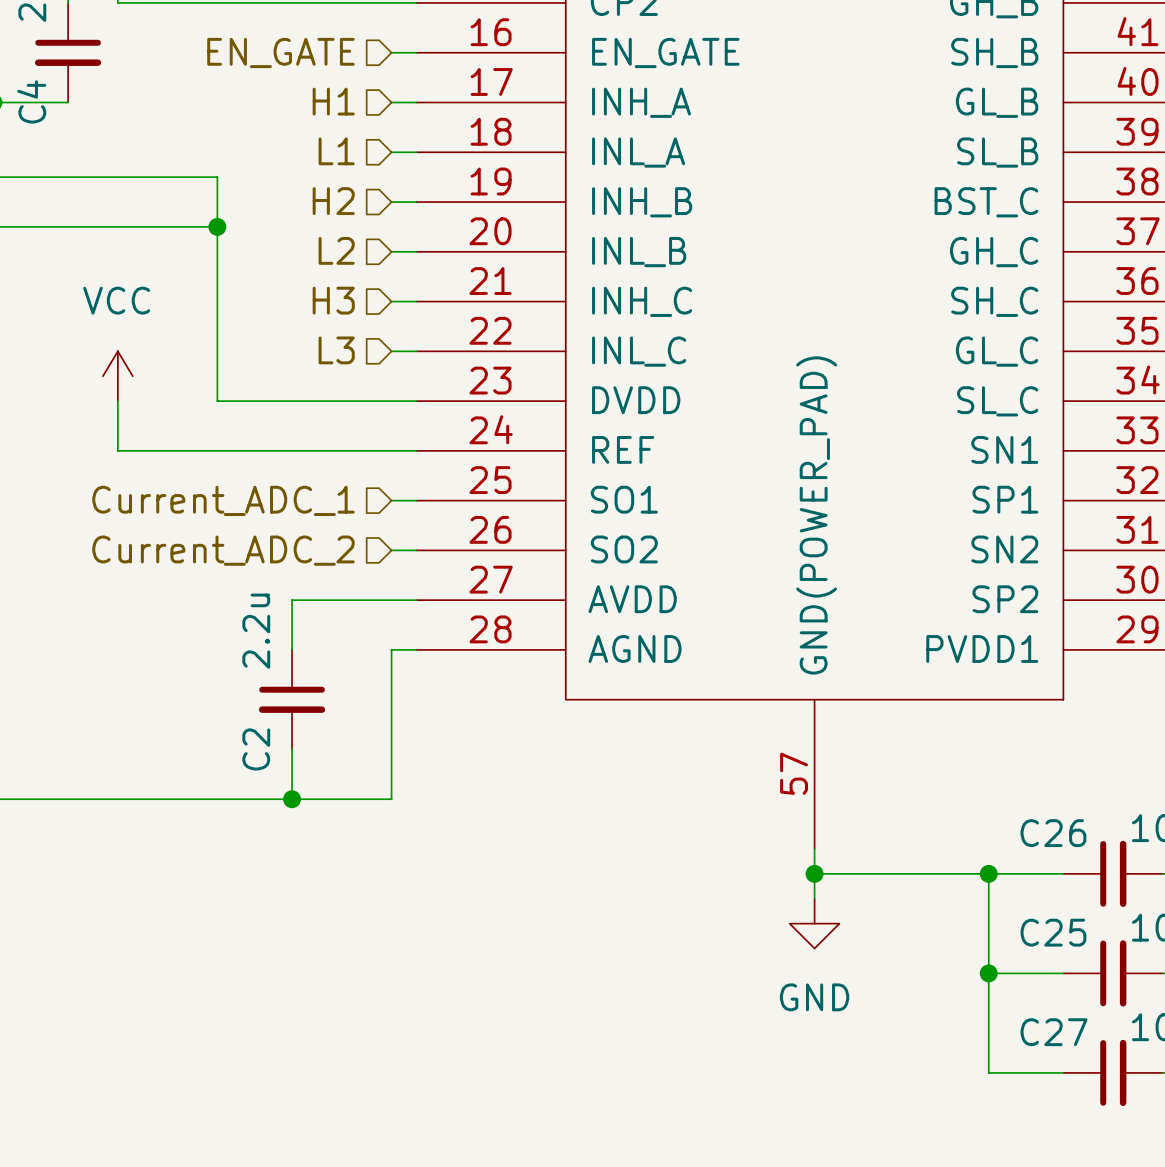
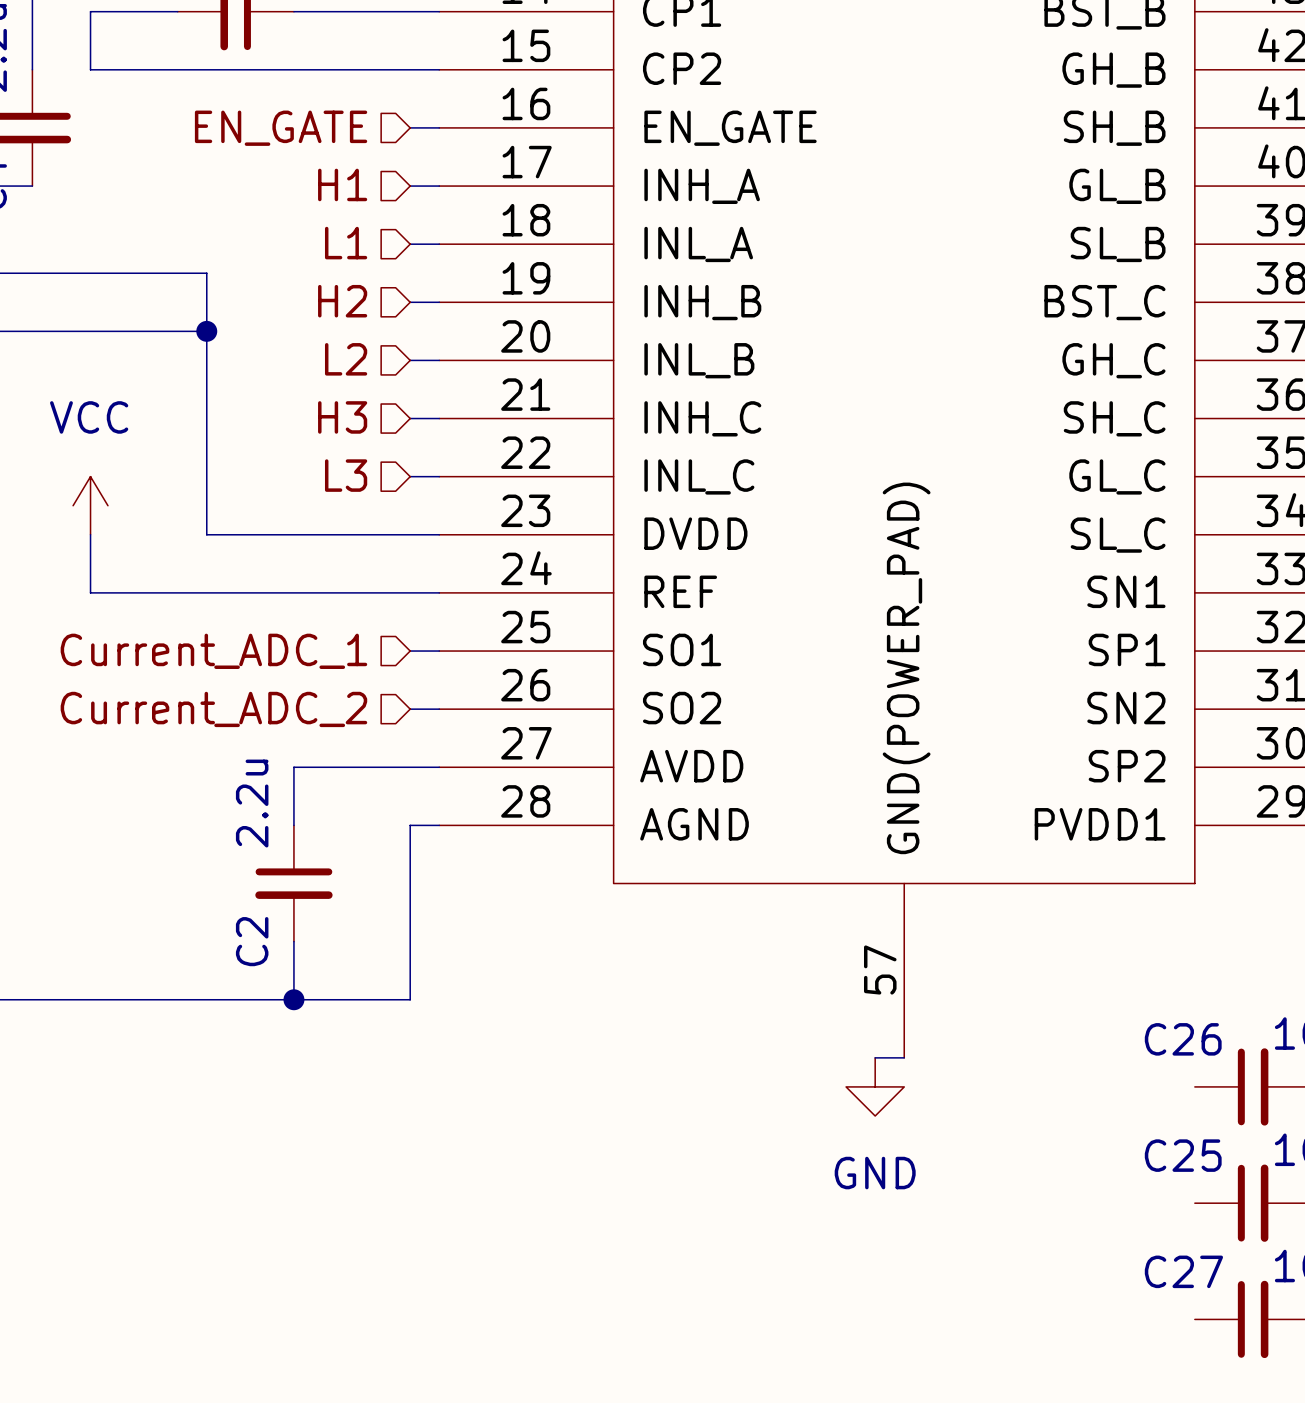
wire: (814, 848) (814, 898) -> (904, 1057) (875, 1057)
wire: (814, 873) (1063, 873) -> none
junction: (814, 873) -> none
wire: (988, 873) (988, 1072) (1063, 1072) -> none
junction: (988, 873) -> none
power symbol position: GND (814, 923) -> GND (875, 1086)
wire: (988, 973) (1063, 973) -> none
junction: (988, 973) -> none

